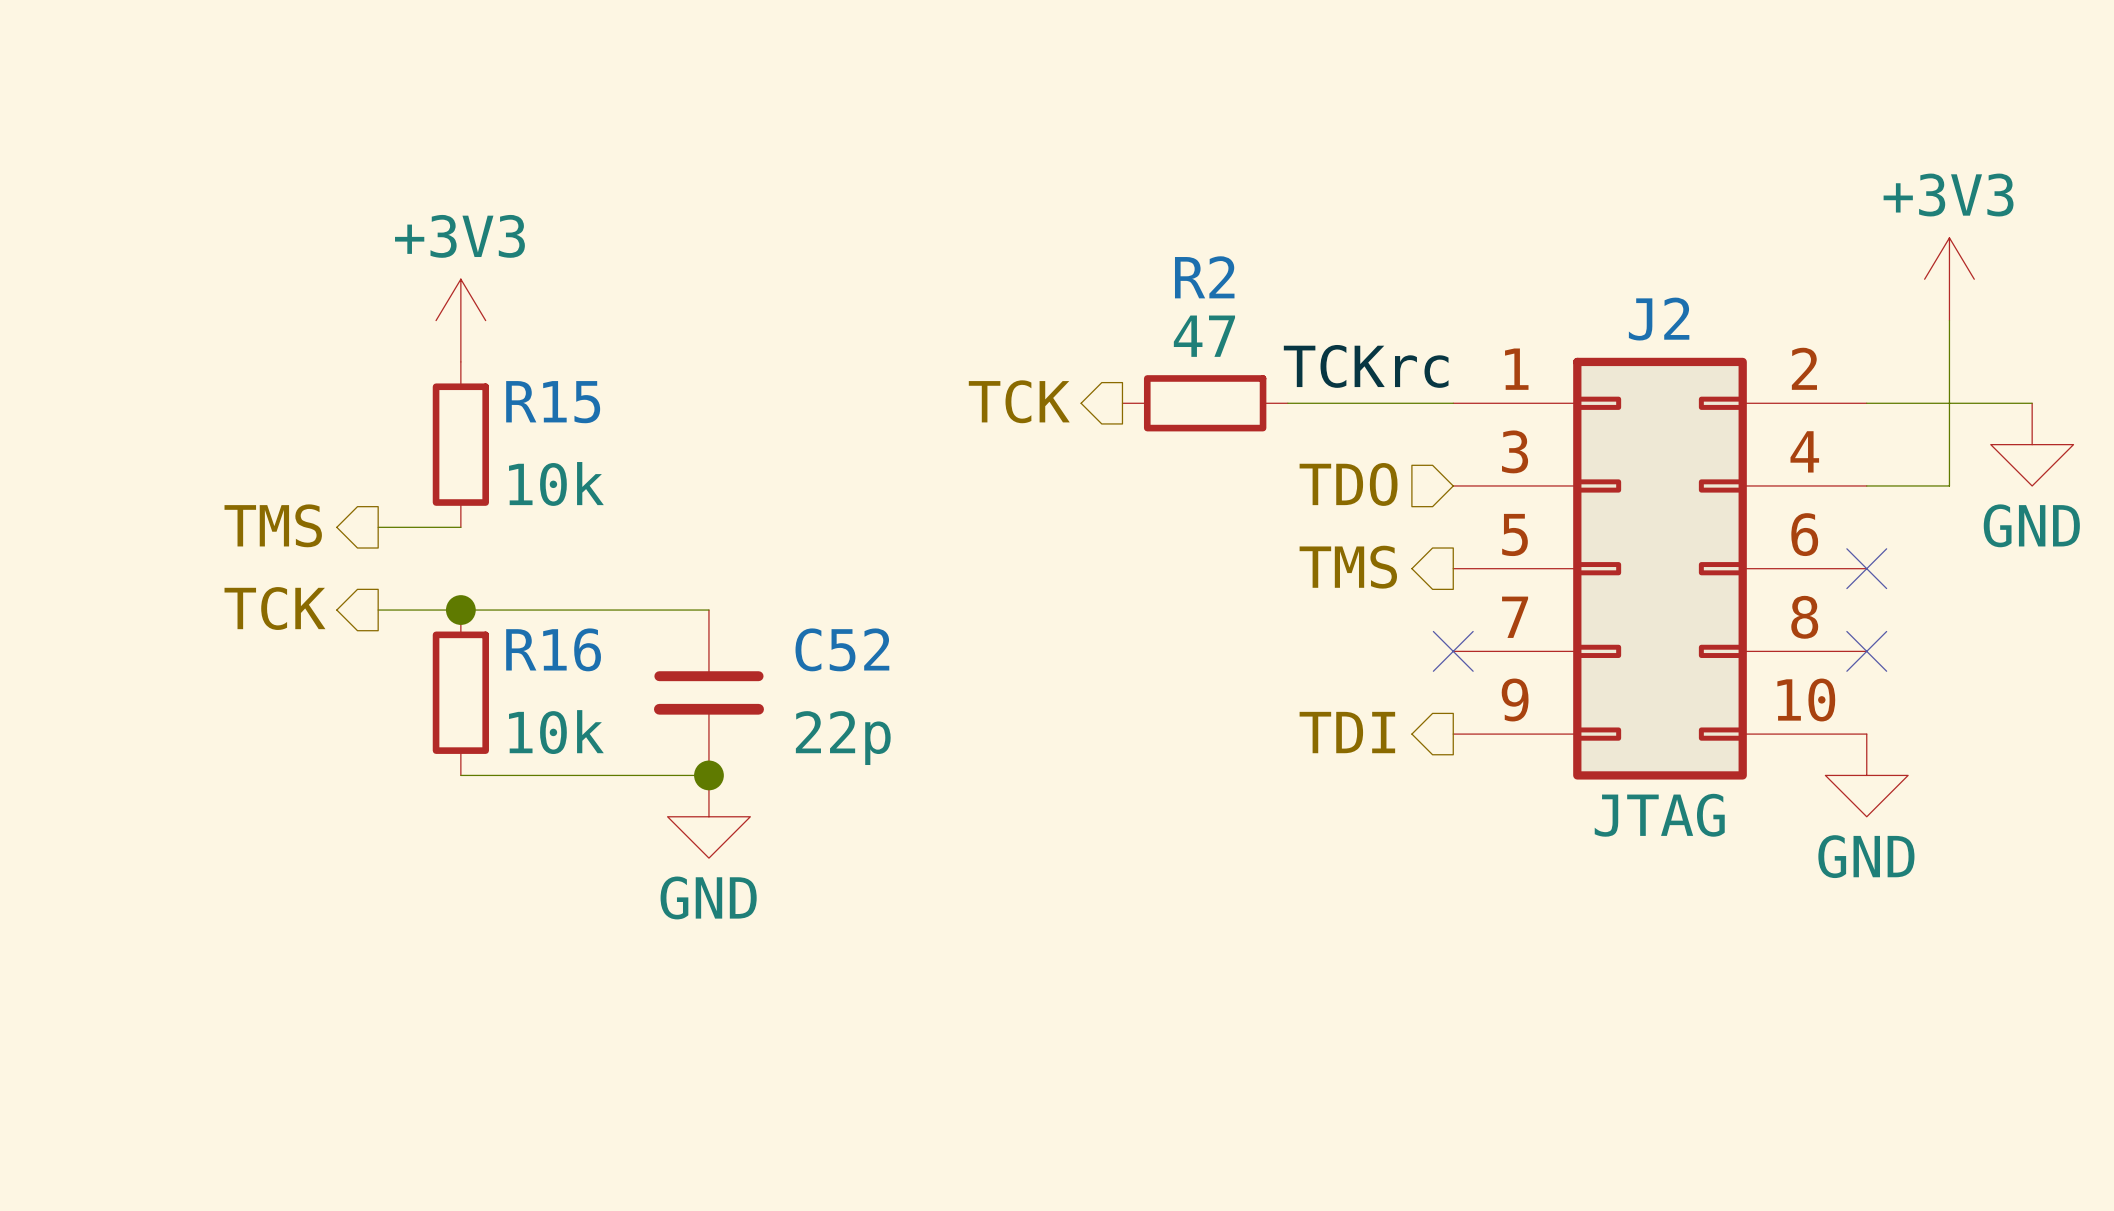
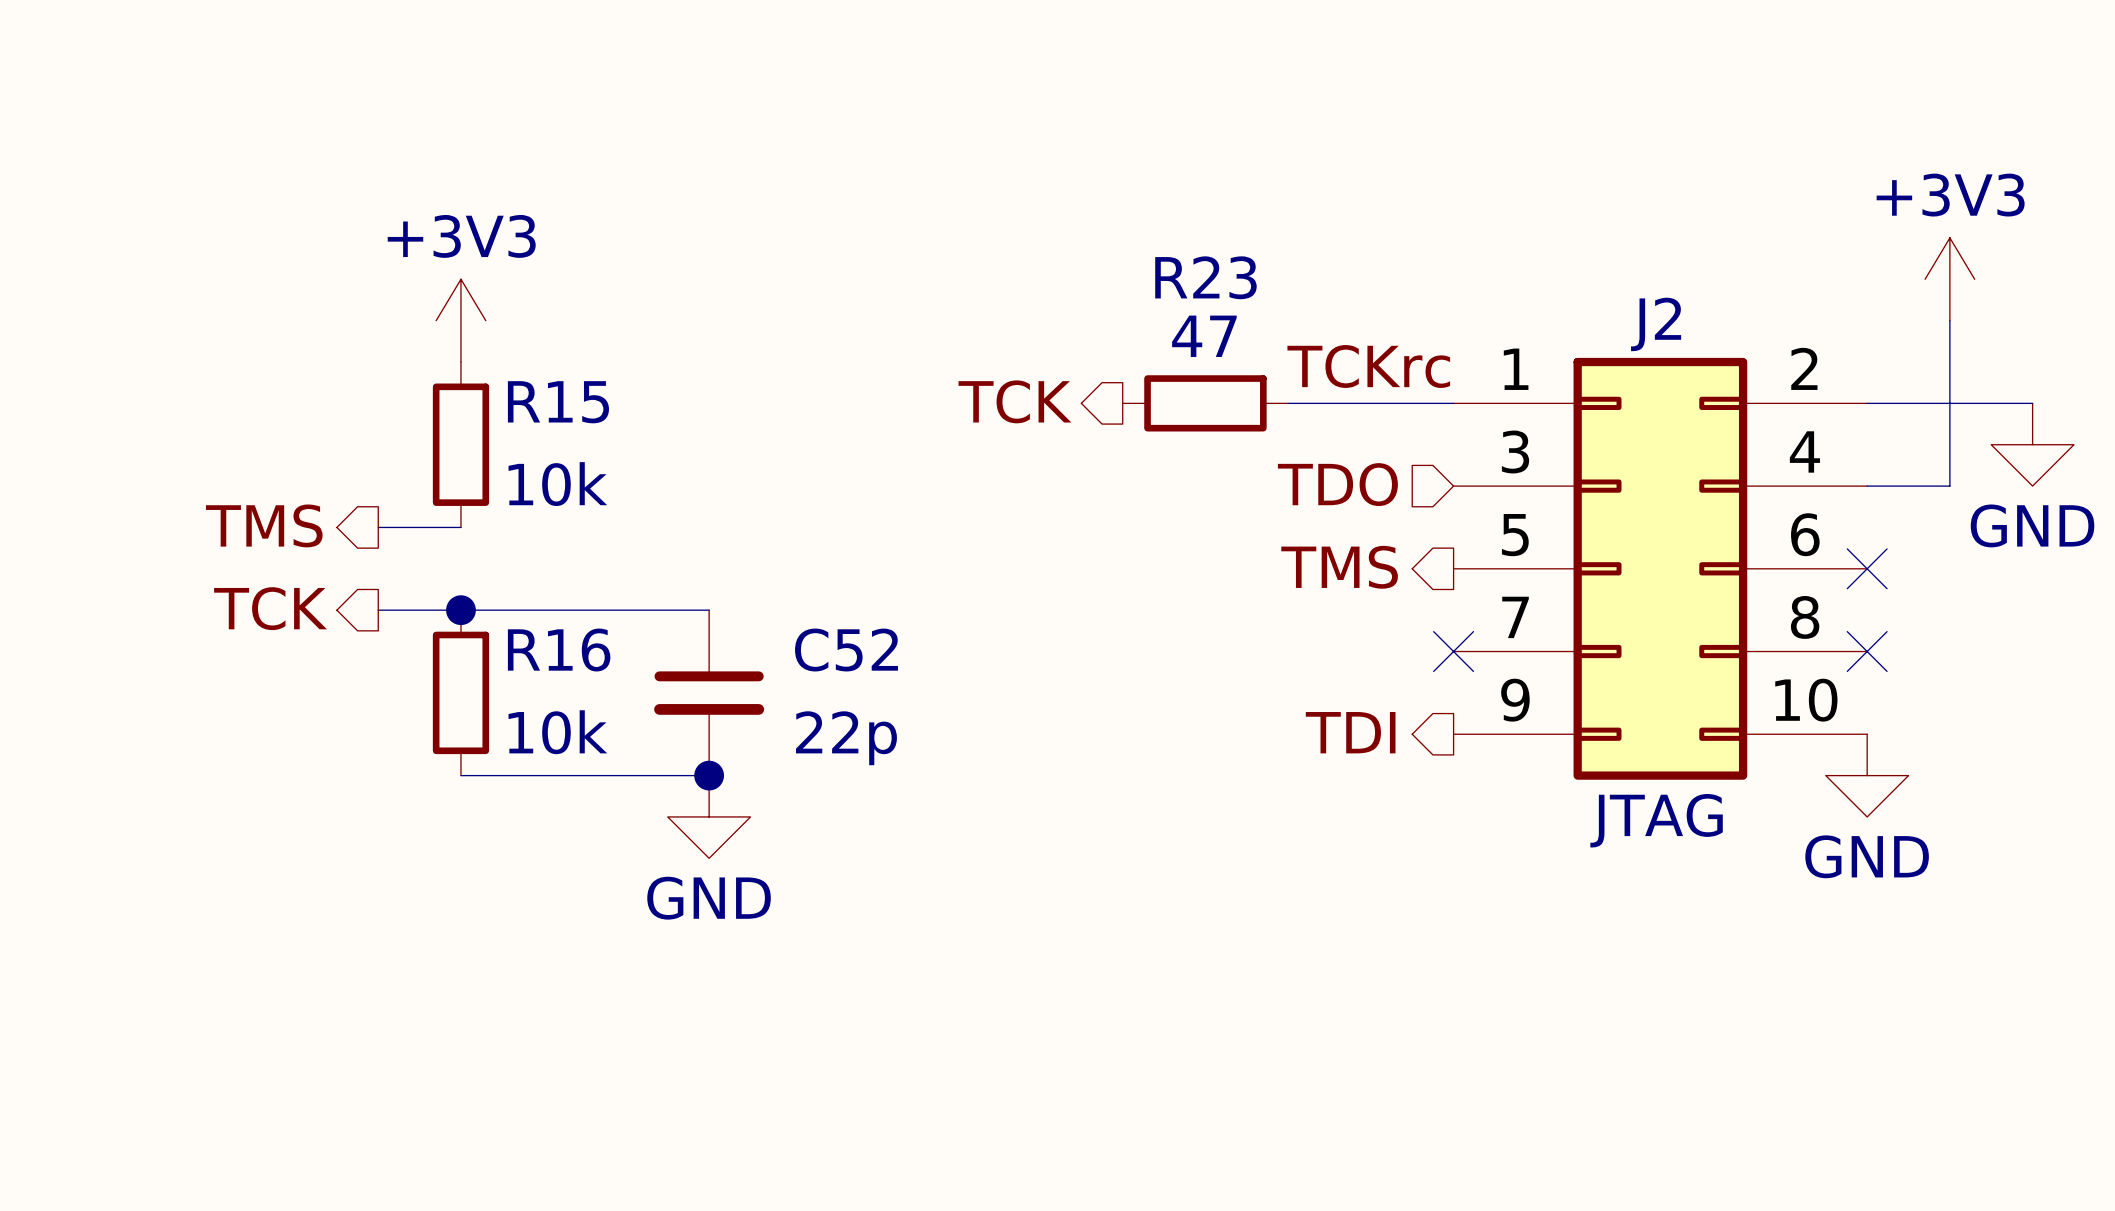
R2 name: R2 (1204, 277) -> R23 (1205, 277)

